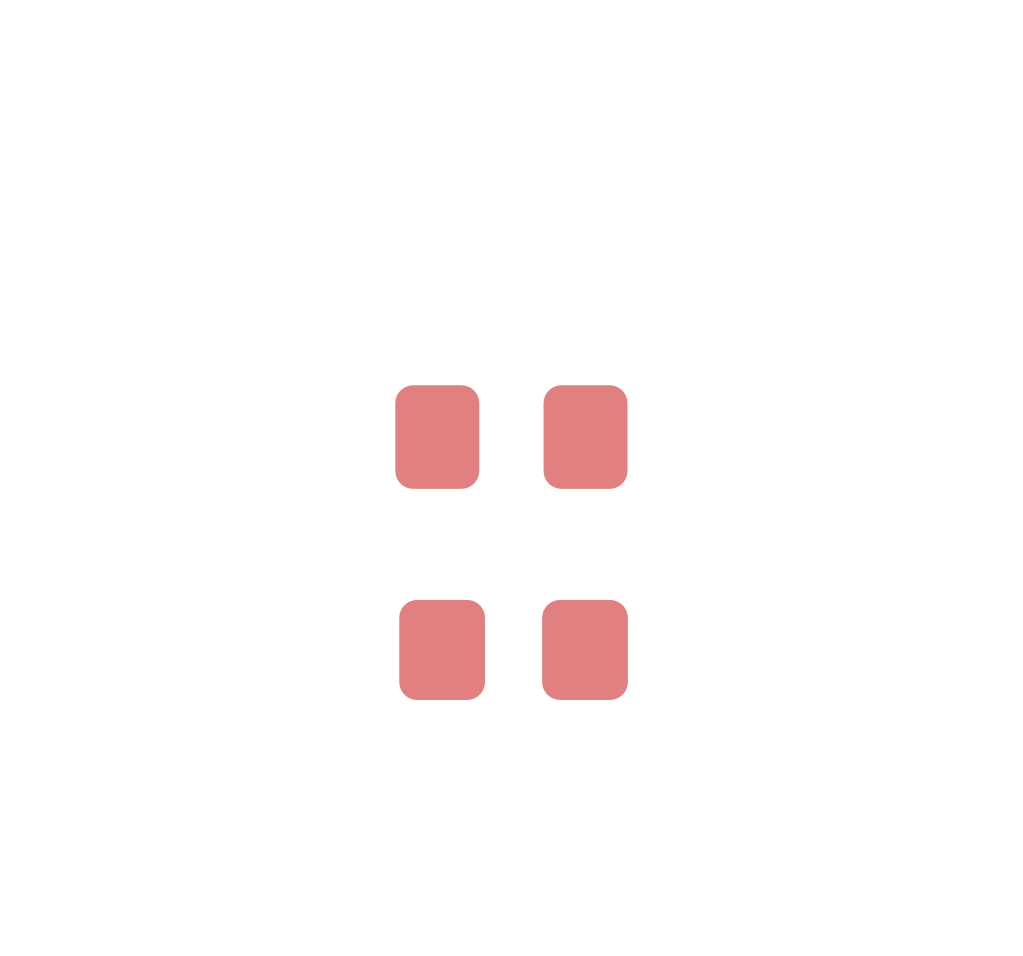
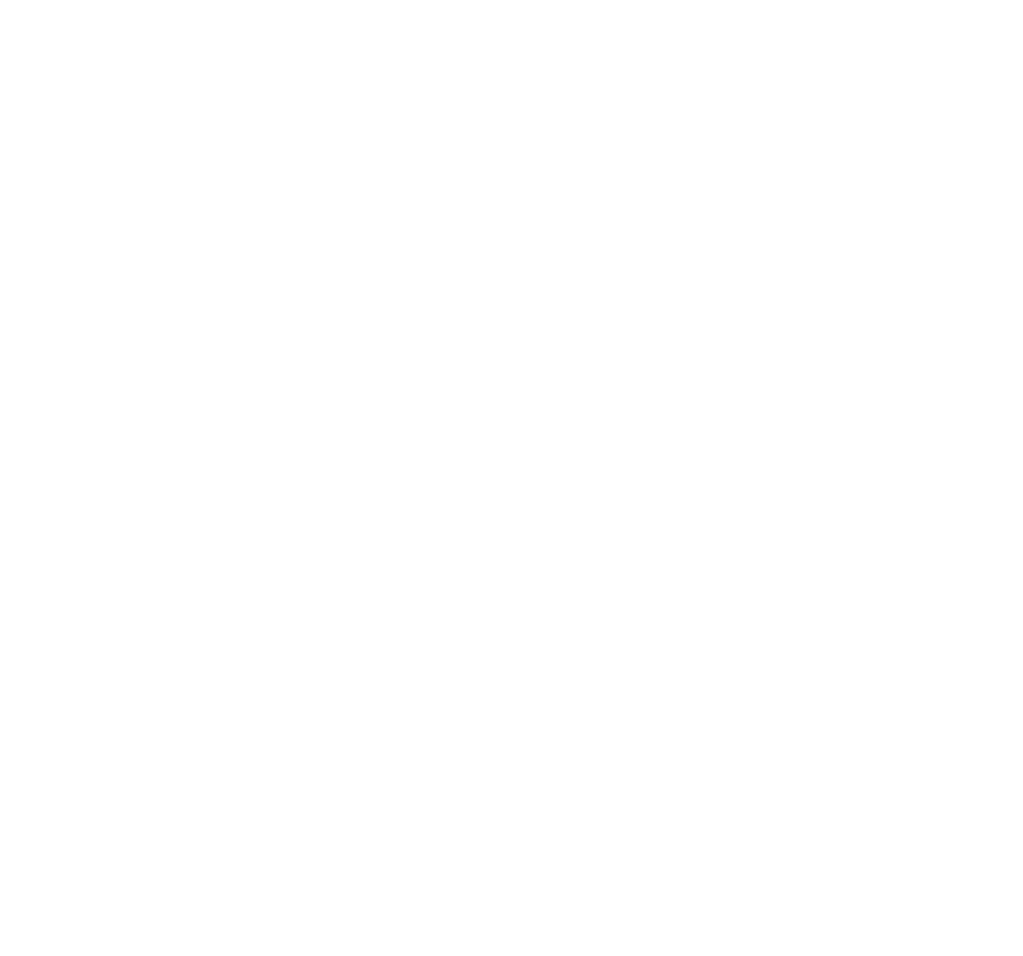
part: (511, 437) -> none
part: (513, 649) -> none

